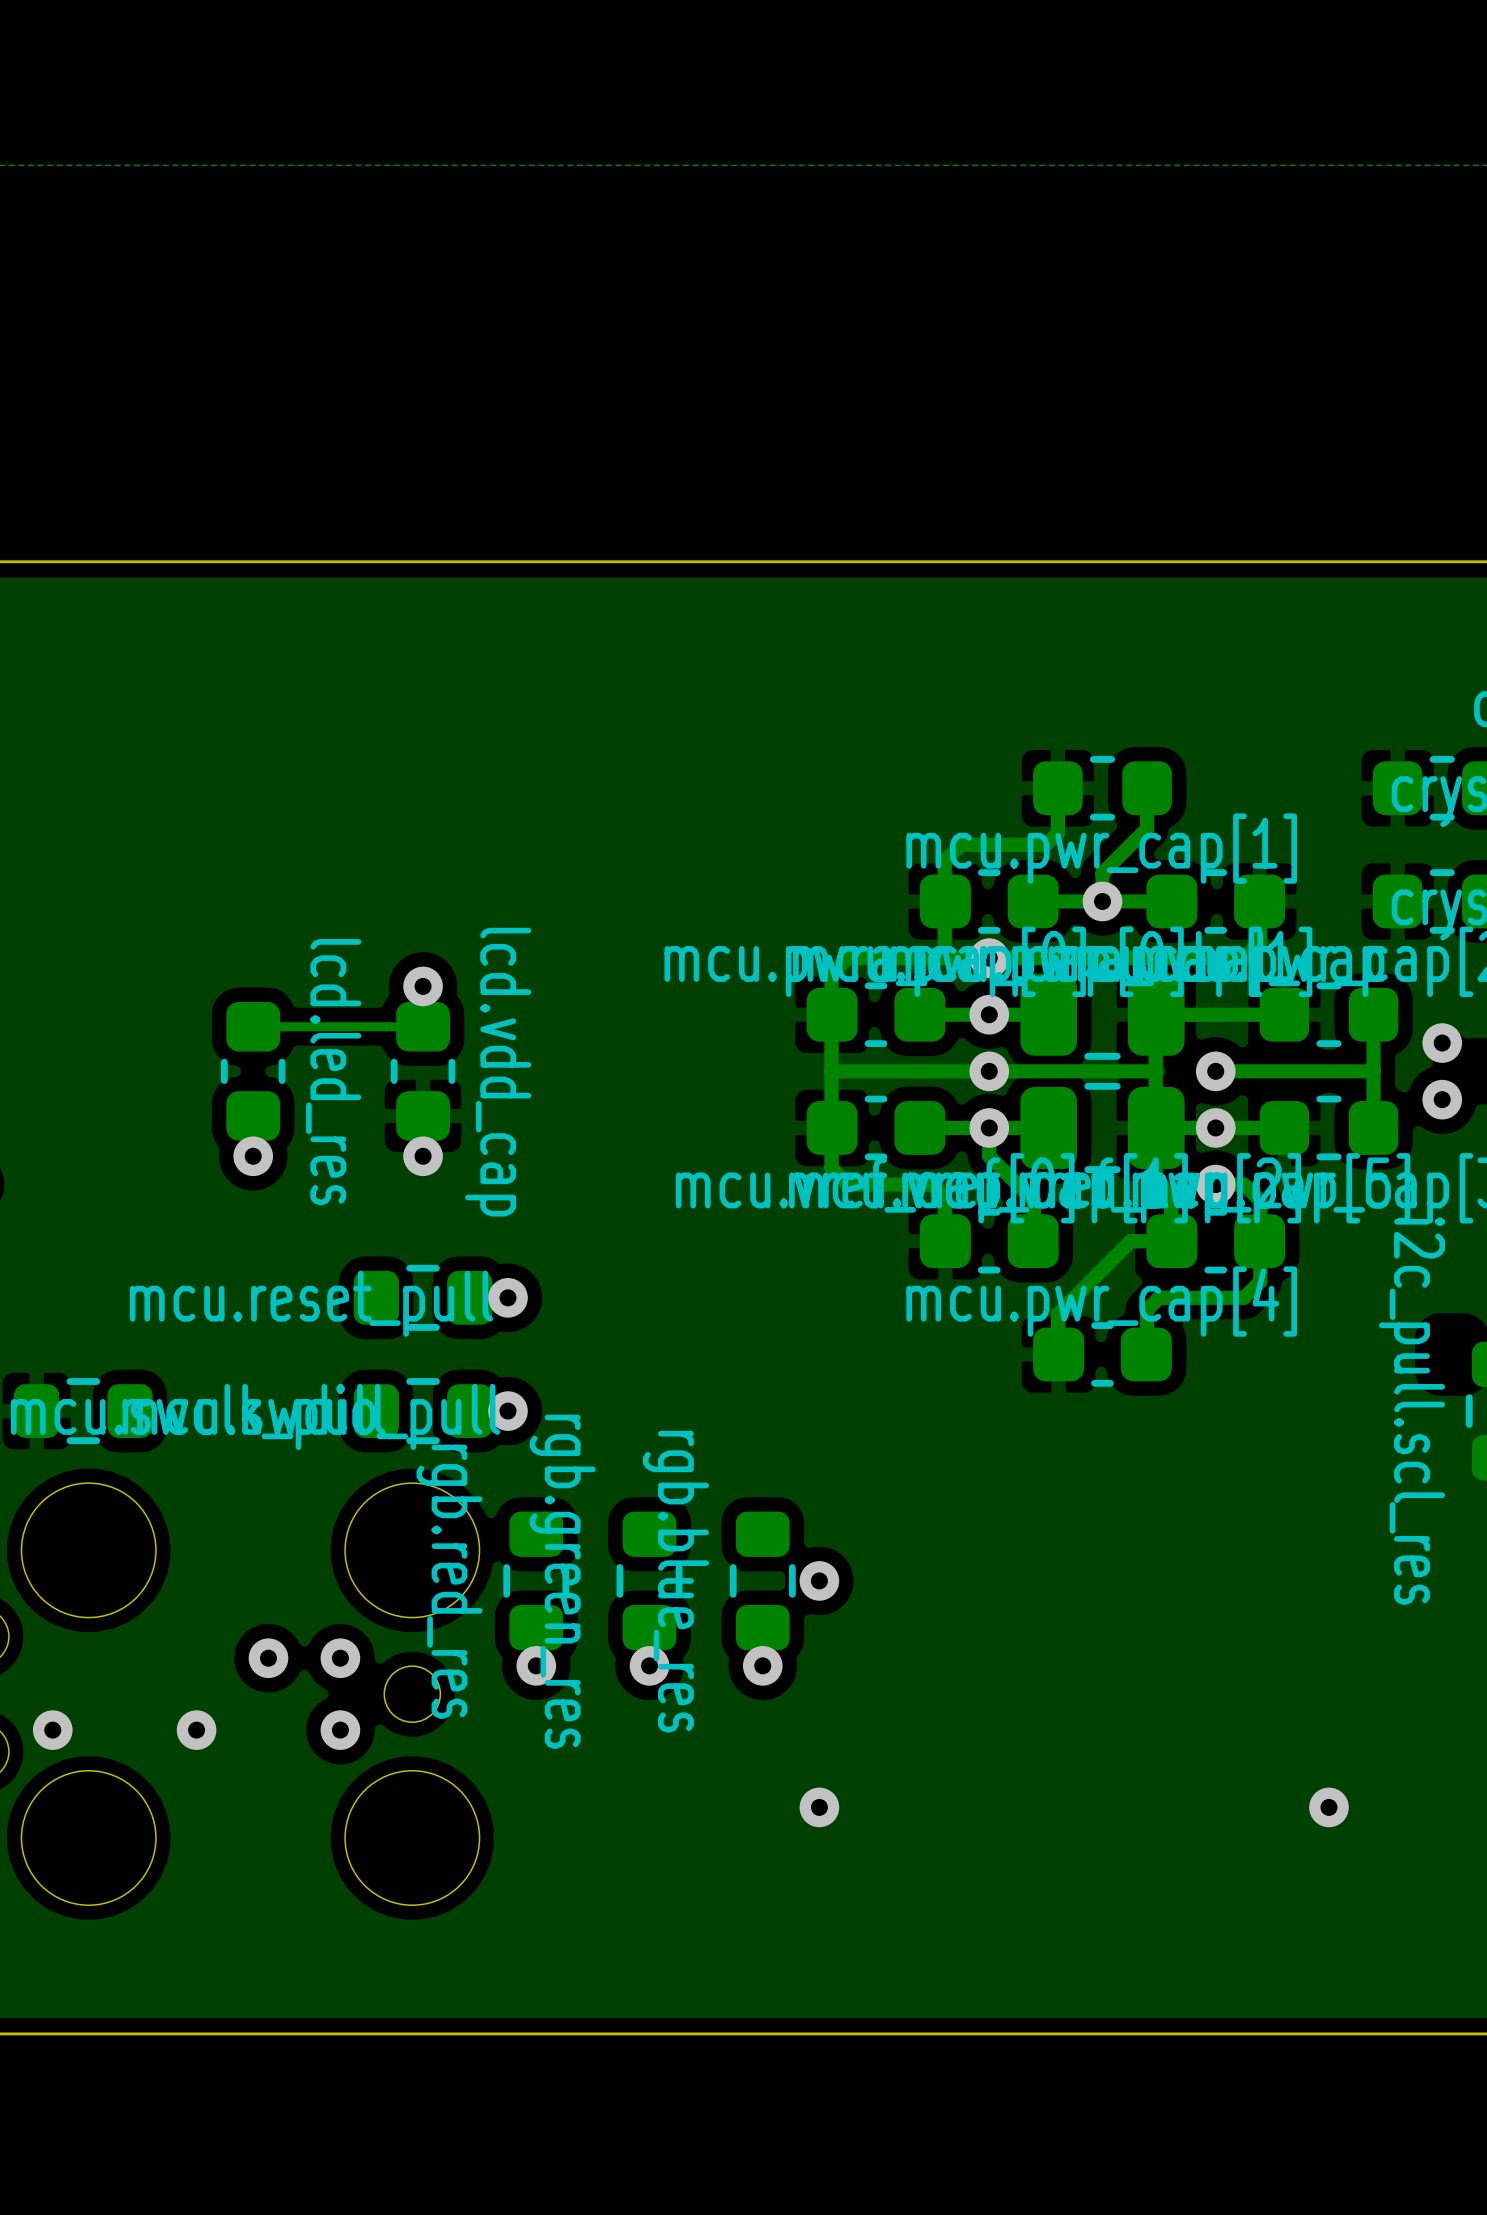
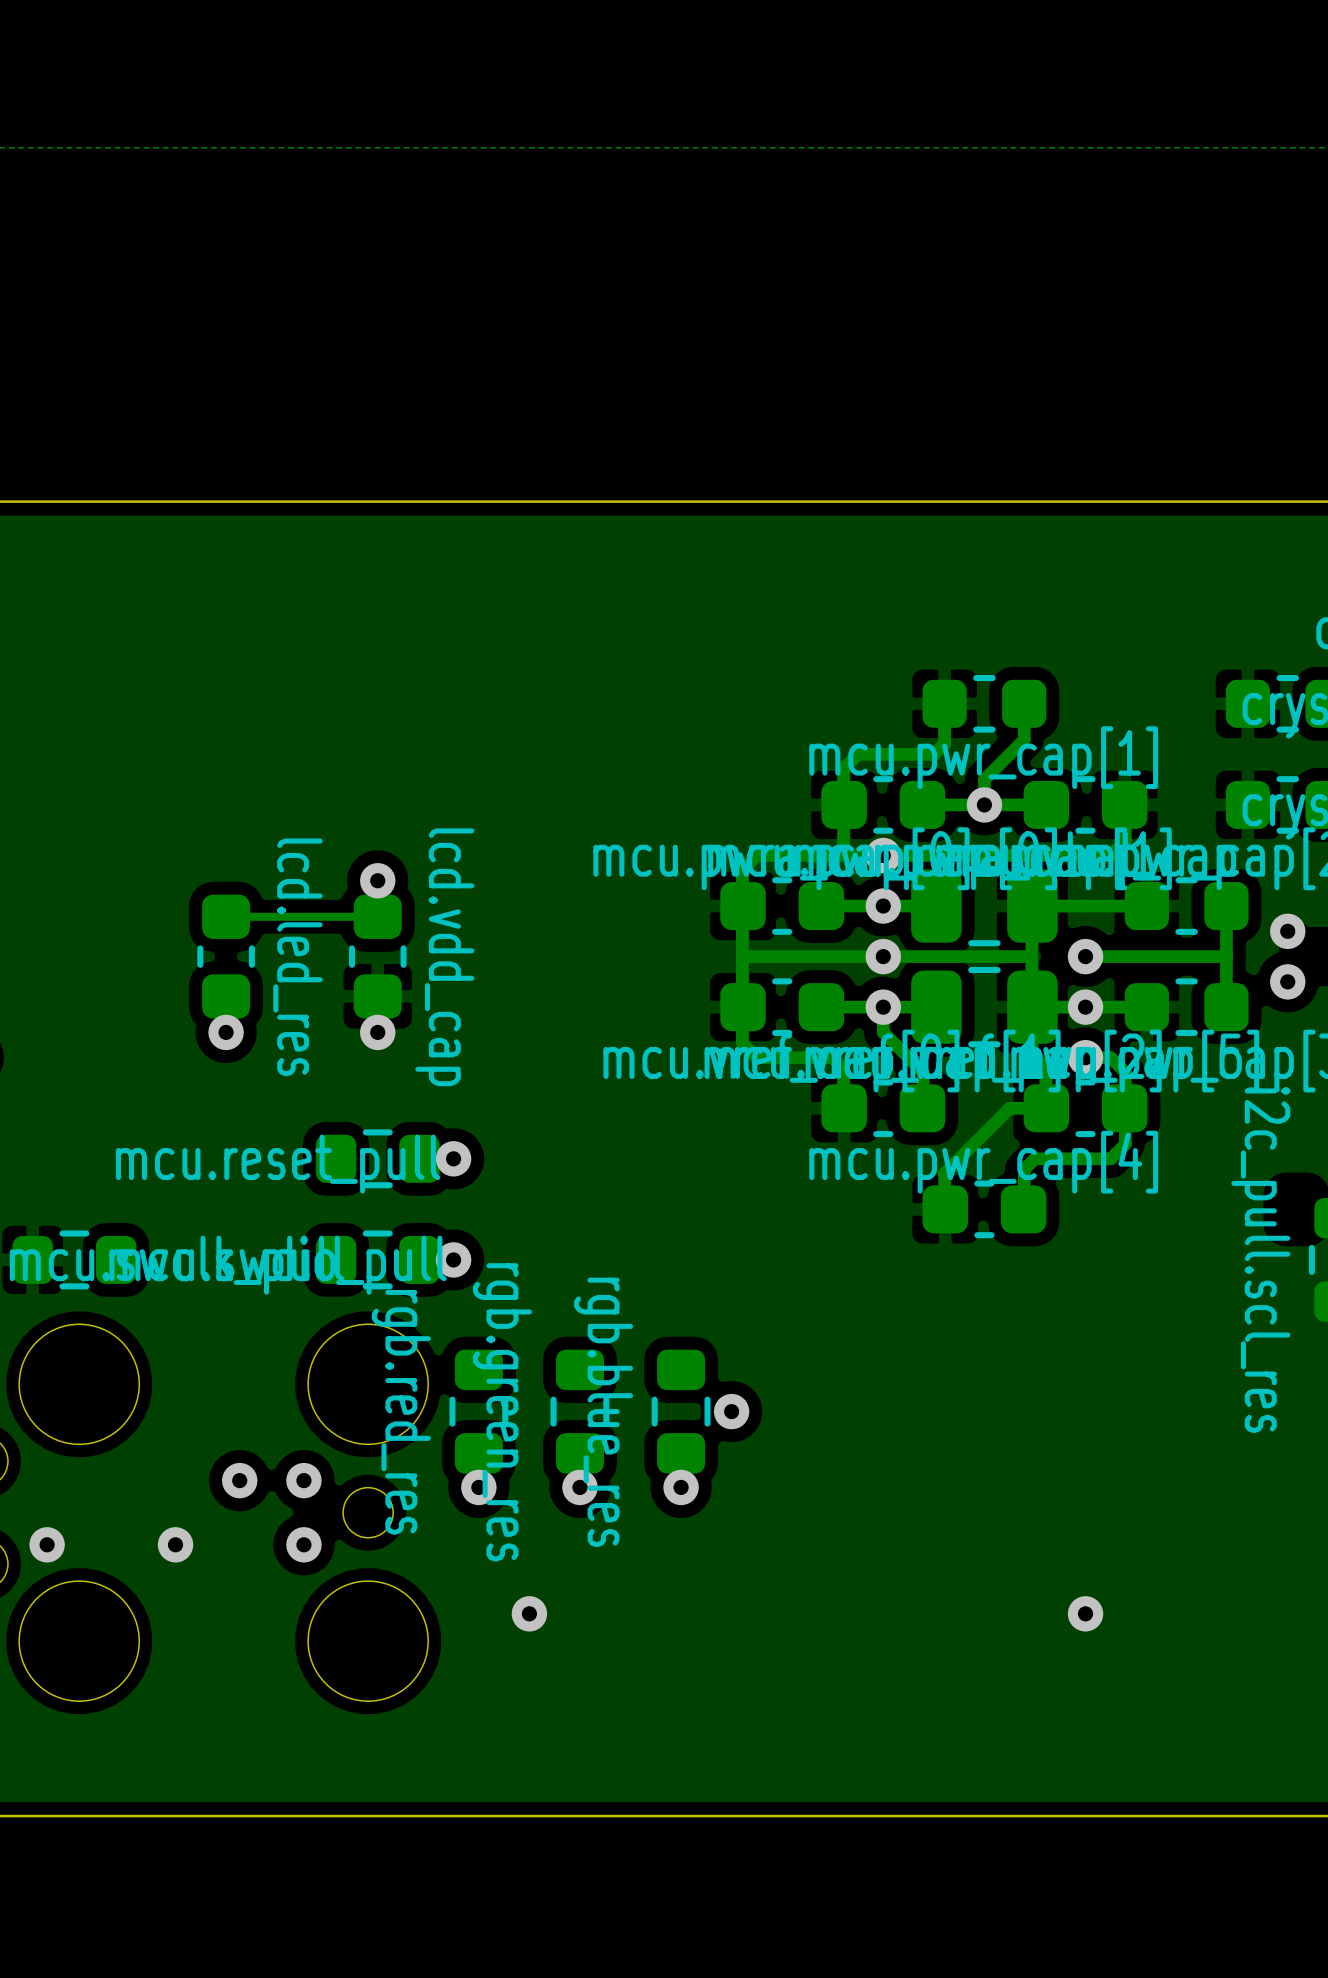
via: none -> (529, 1613)
via: (819, 1807) -> none
via position: (1328, 1807) -> (1085, 1613)

